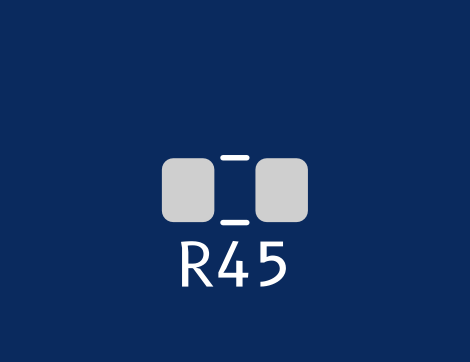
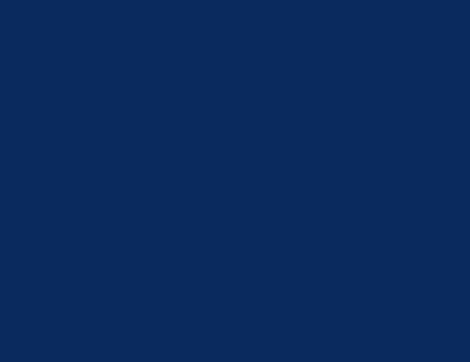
R45: (234, 190) -> none

